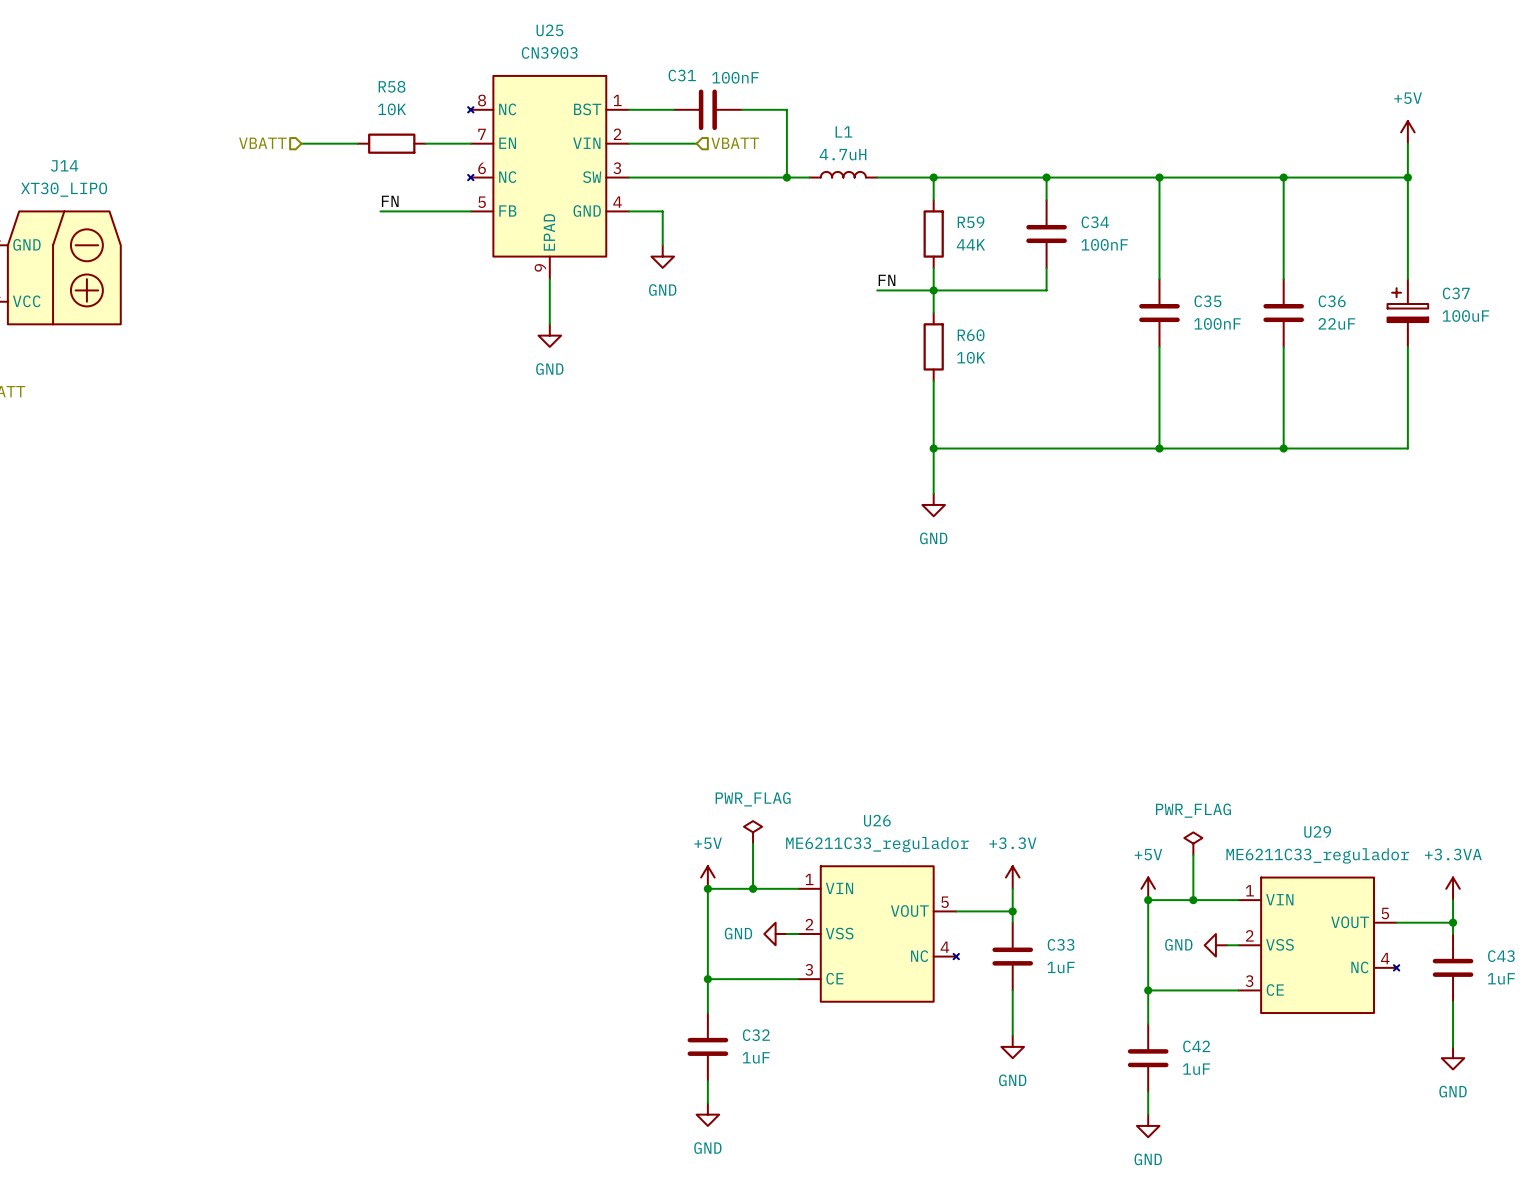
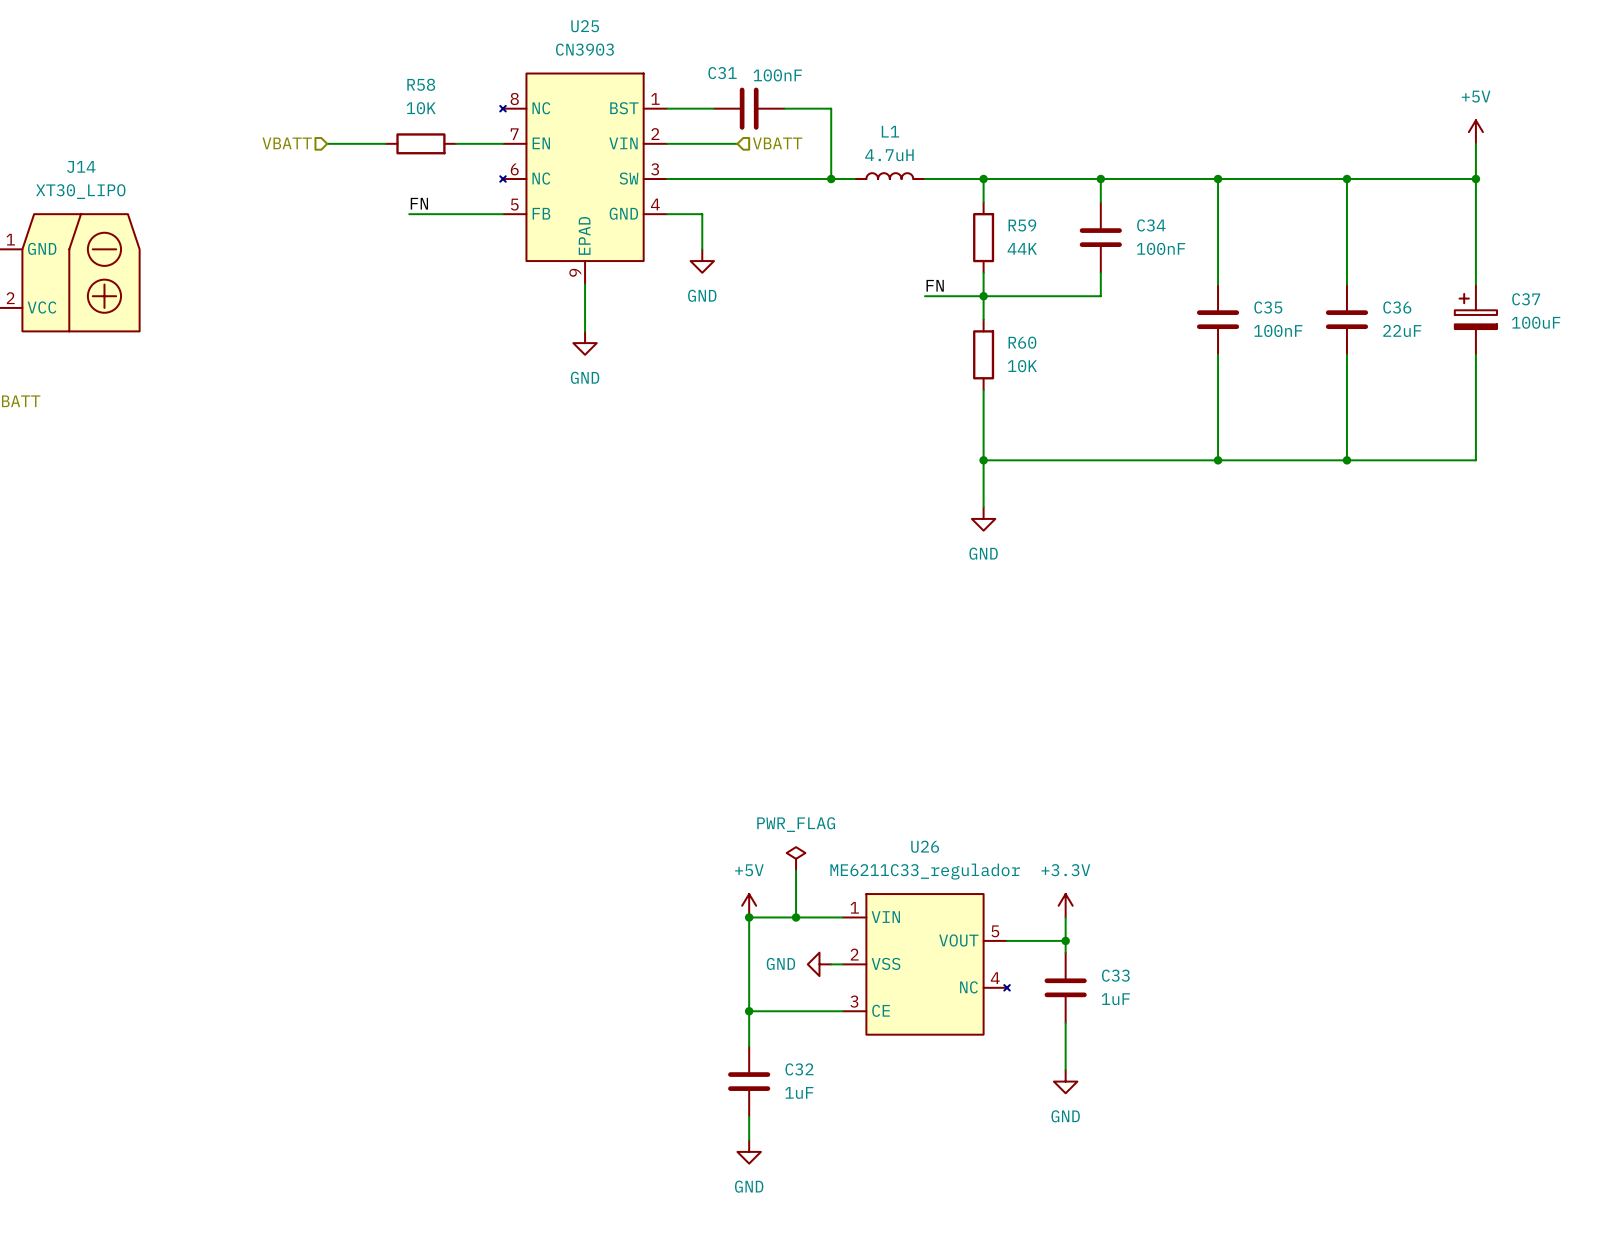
power symbol: PWR_FLAG (1193, 843) -> none
wire: (1193, 854) (1193, 900) -> none
power symbol: +5V (1148, 888) -> none
power symbol: +3.3VA (1453, 888) -> none
junction: (1148, 900) -> none
junction: (1193, 900) -> none
wire: (1238, 900) (1148, 900) (1148, 1024) -> none
wire: (1453, 900) (1453, 933) -> none
wire: (1396, 922) (1453, 922) -> none
junction: (1453, 922) -> none
power symbol: GND (1215, 945) -> none
wire: (1227, 945) (1238, 945) -> none
U29: ME6211C33_regulador (1318, 945) -> none
C43: 1uF (1453, 967) -> none
wire: (1148, 990) (1238, 990) -> none
junction: (1148, 990) -> none
wire: (1453, 1001) (1453, 1046) -> none
C42: 1uF (1148, 1058) -> none
power symbol: GND (1453, 1058) -> none
wire: (1148, 1092) (1148, 1114) -> none
power symbol: GND (1148, 1125) -> none

